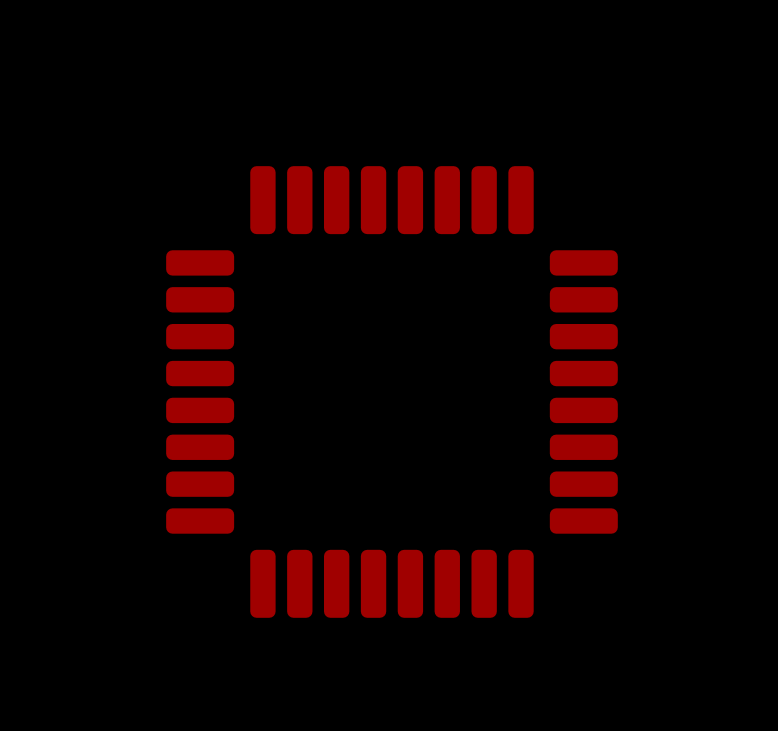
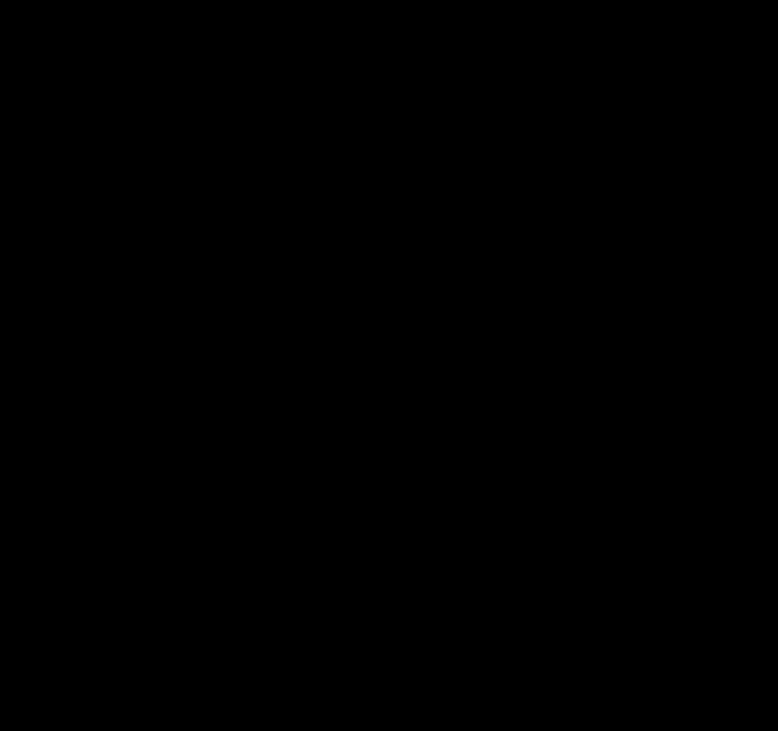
part: (391, 391) -> none

